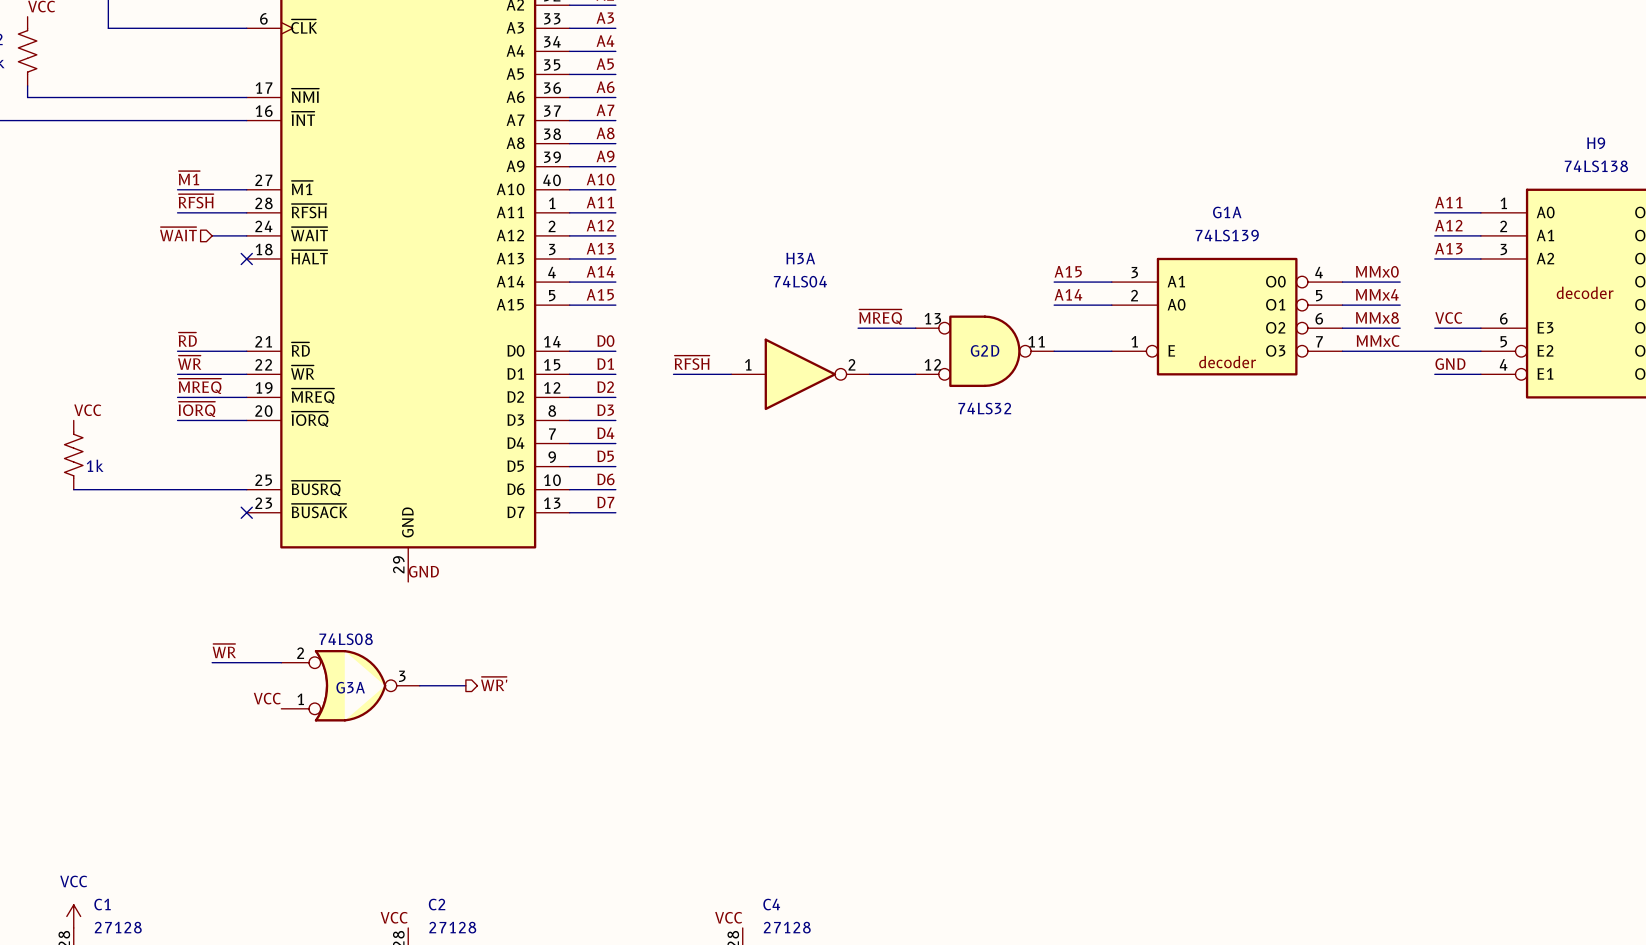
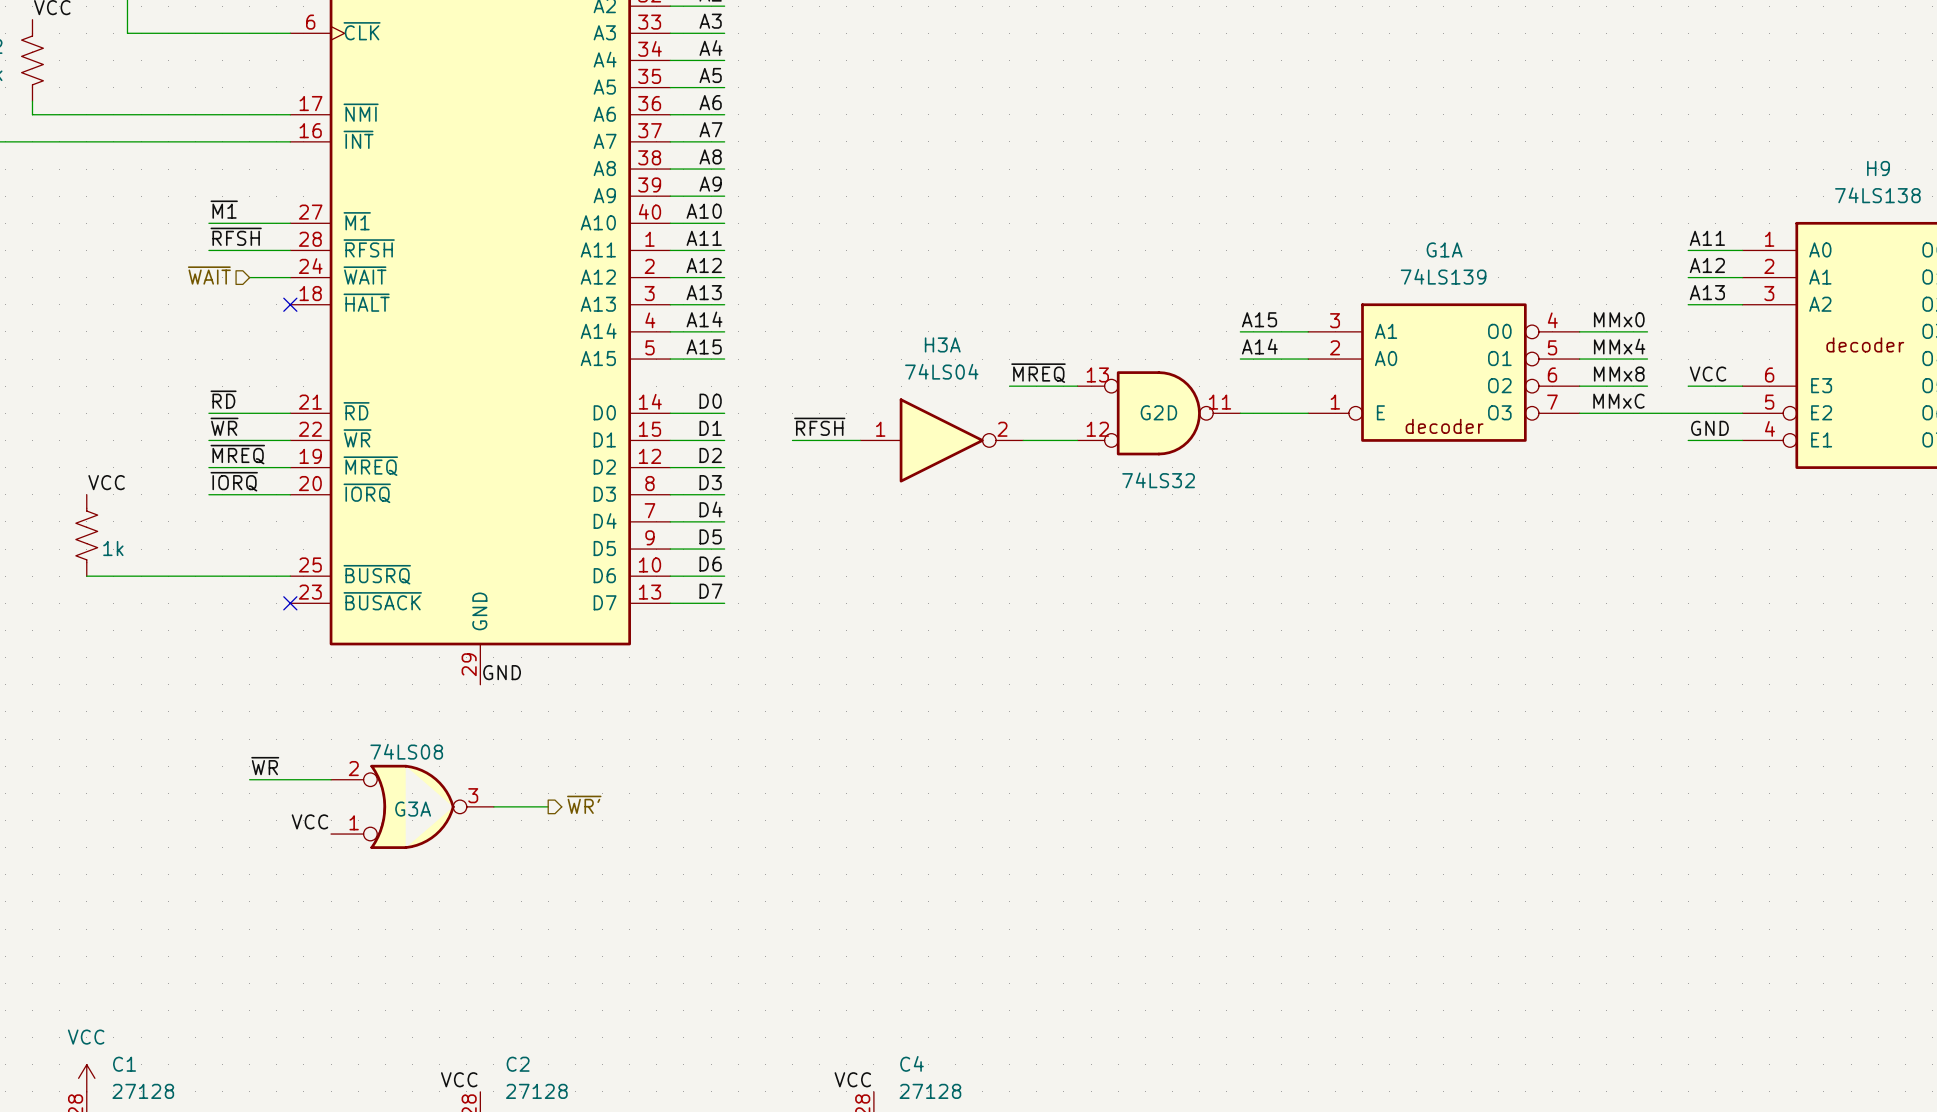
H3A name position: H3A (800, 258) -> H3A (942, 344)
H3A value position: 74LS04 (800, 281) -> 74LS04 (941, 371)

